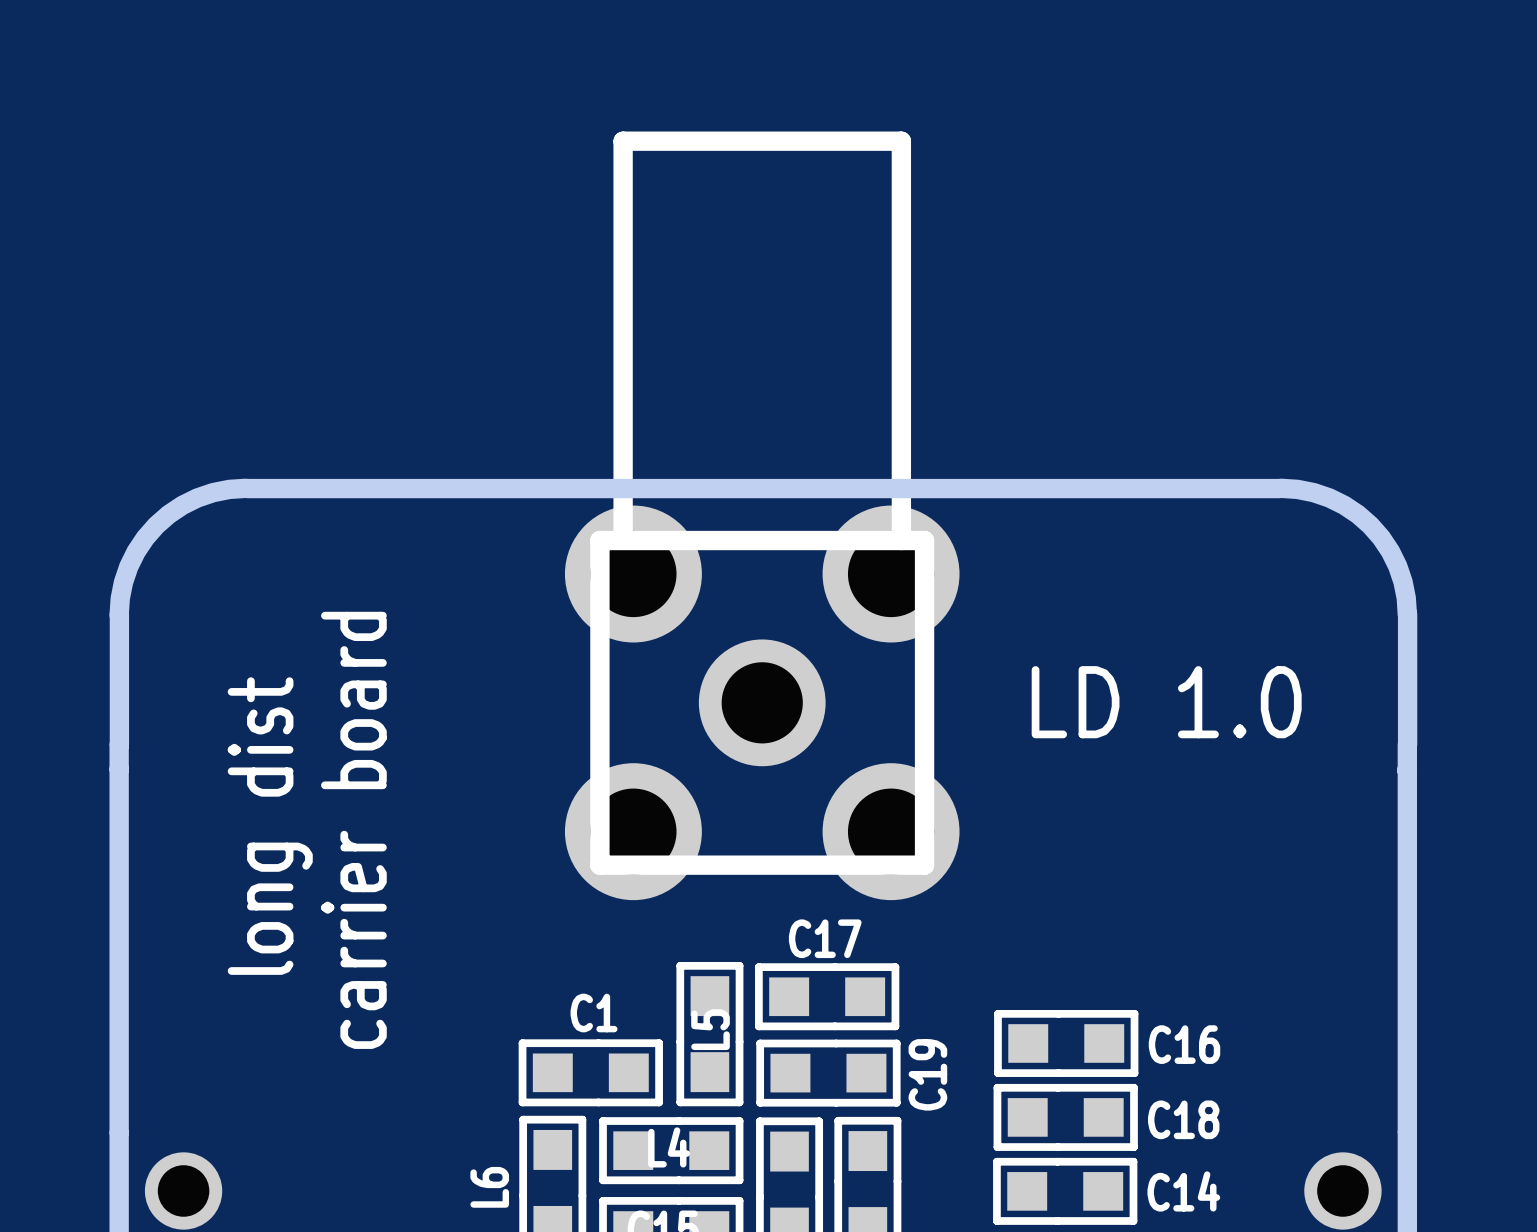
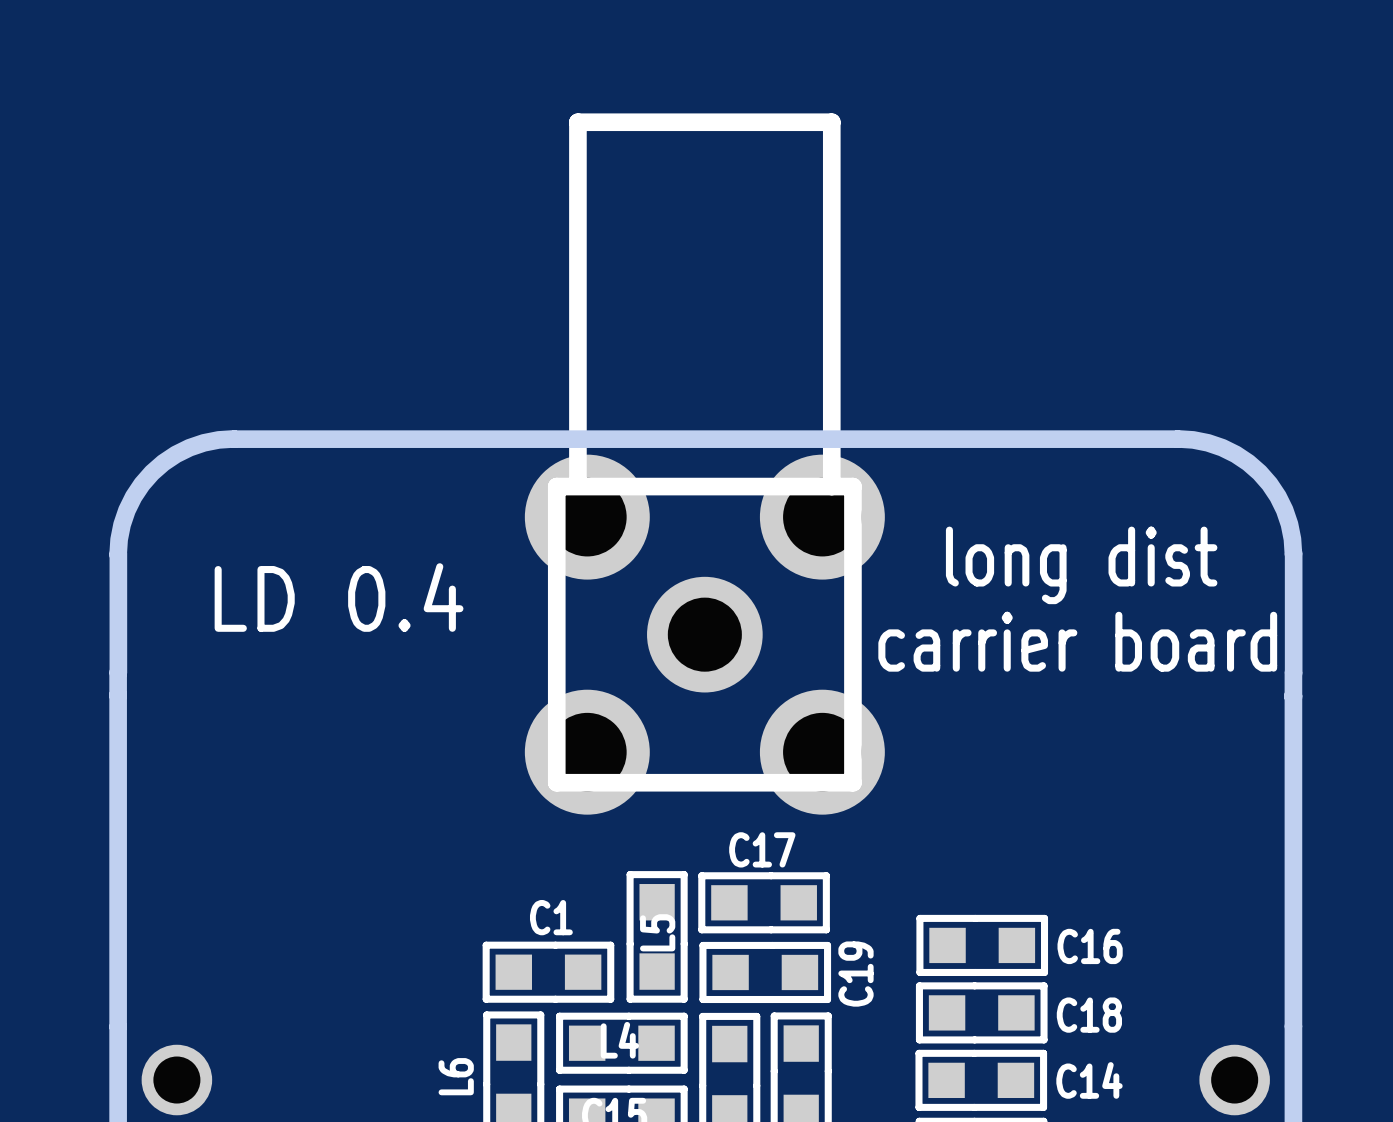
text: none -> LD 0.4 (339, 597)
text: LD 1.0 (1166, 702) -> carrier board (1077, 641)
text rotation: 0° (270, 826) -> 90° clockwise (1081, 565)
text position: long dist (270, 826) -> long dist (1081, 565)
text: carrier board (353, 830) -> none

